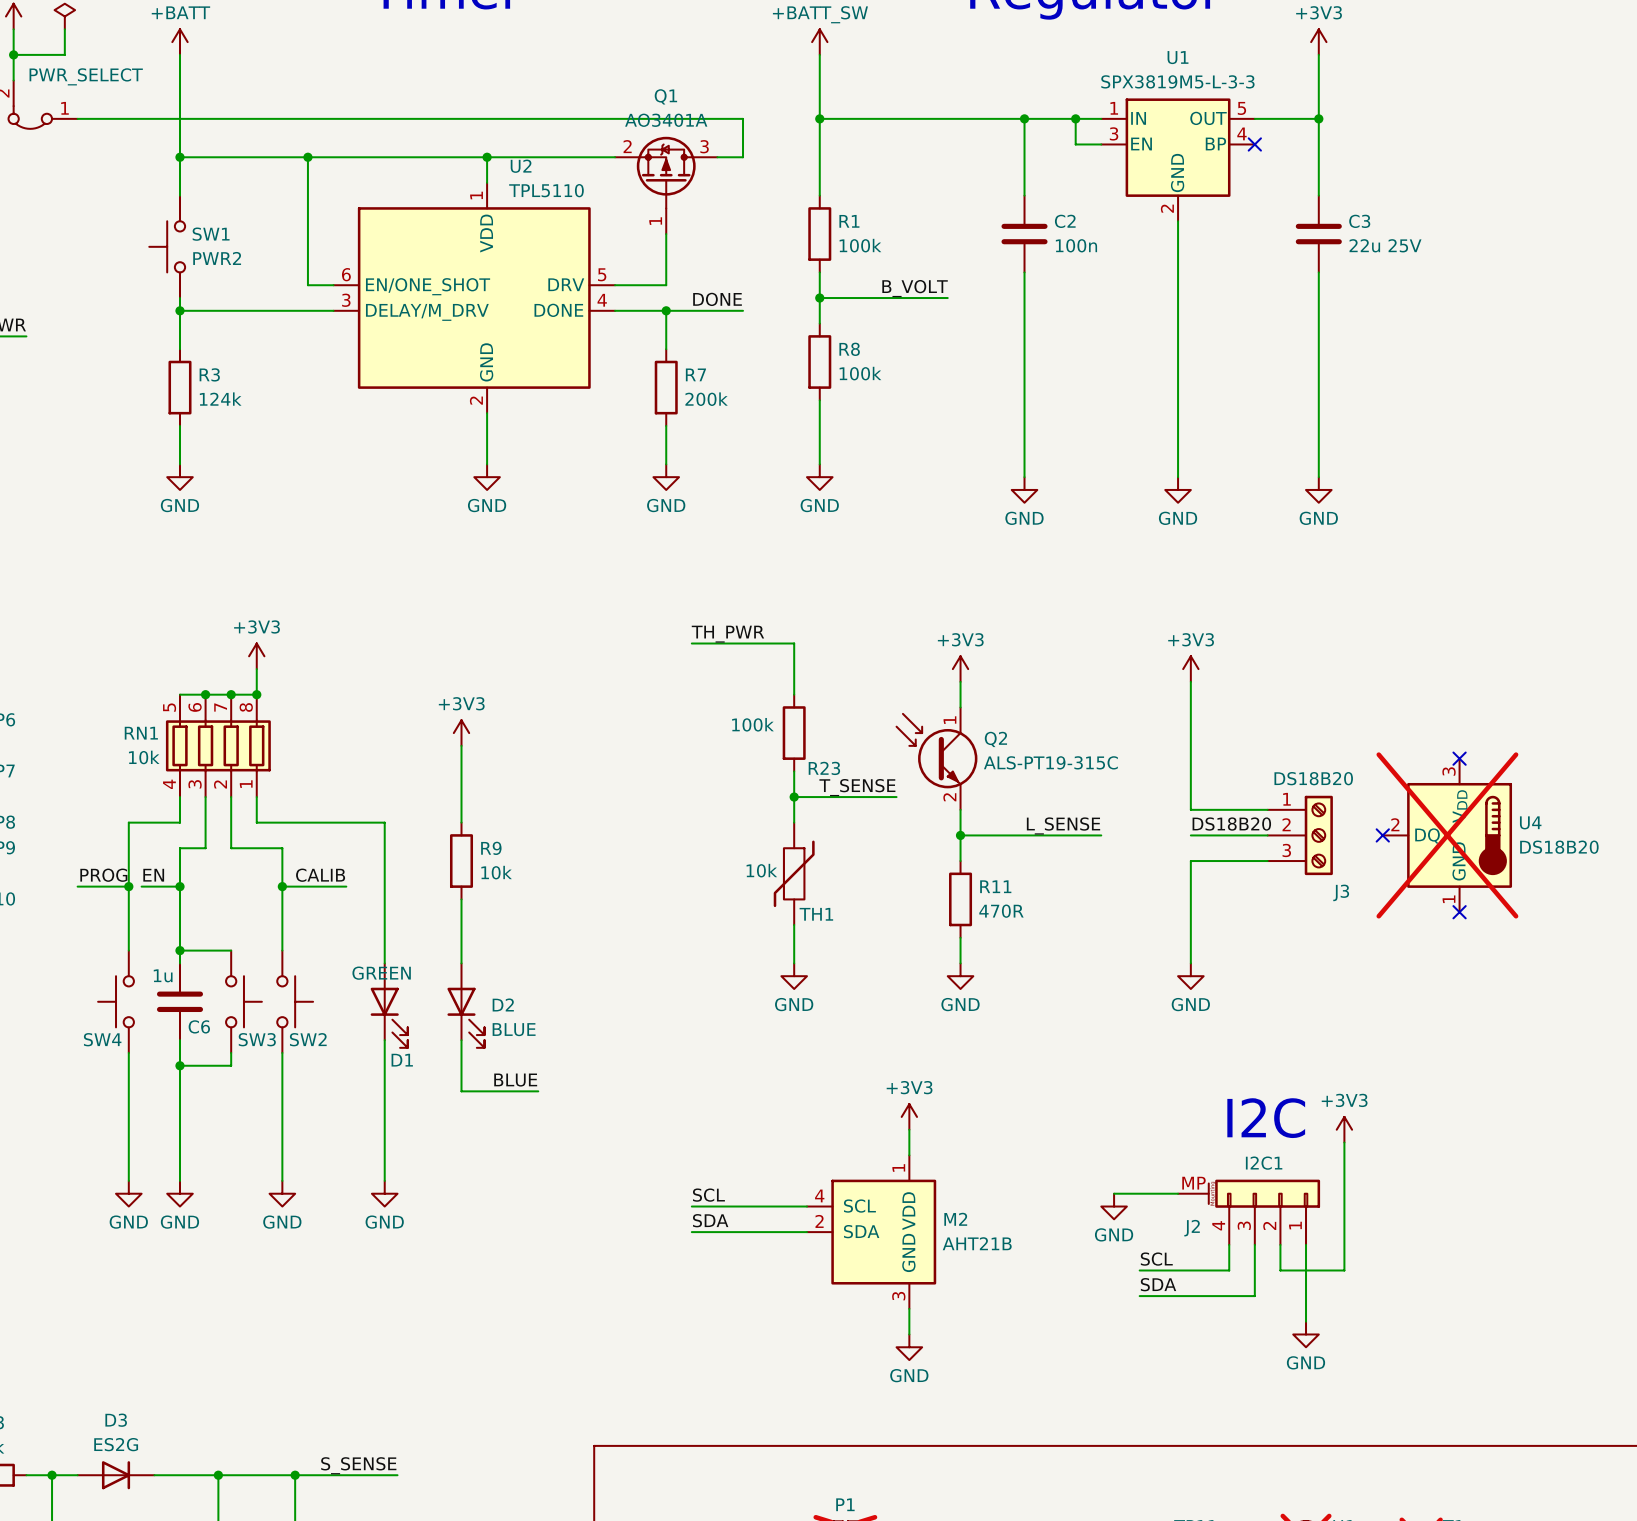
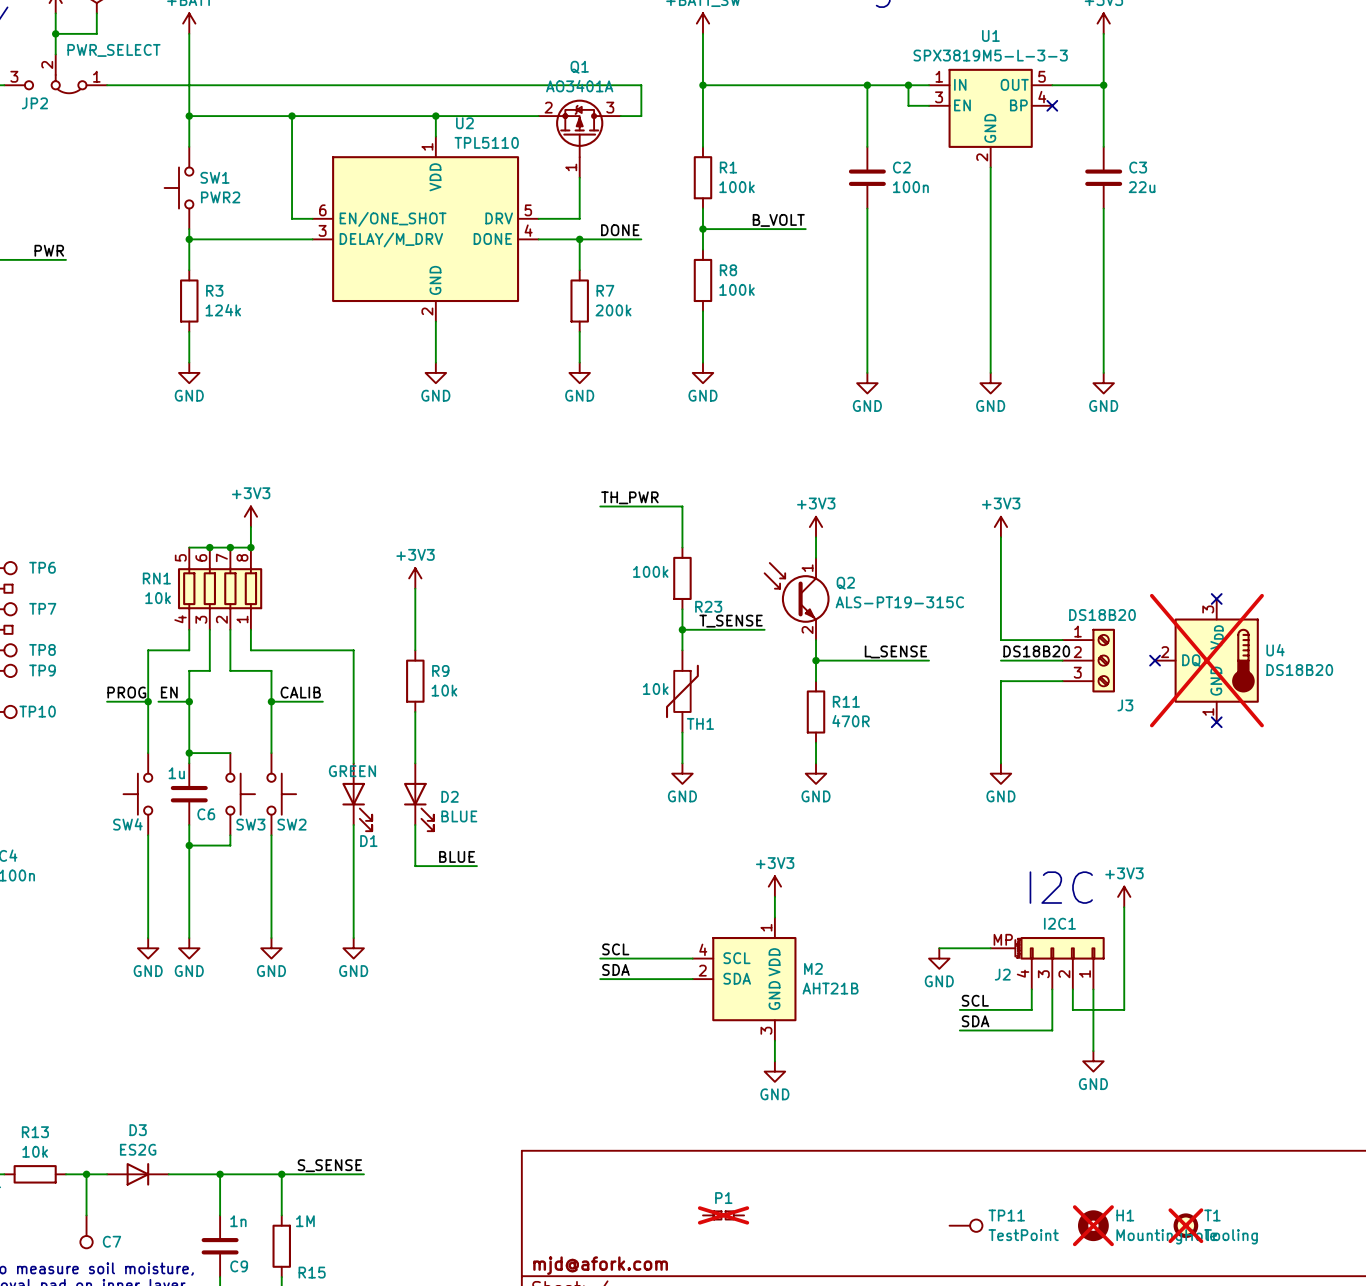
C3 value: 22u 25V (1385, 245) -> 22u (1142, 187)

